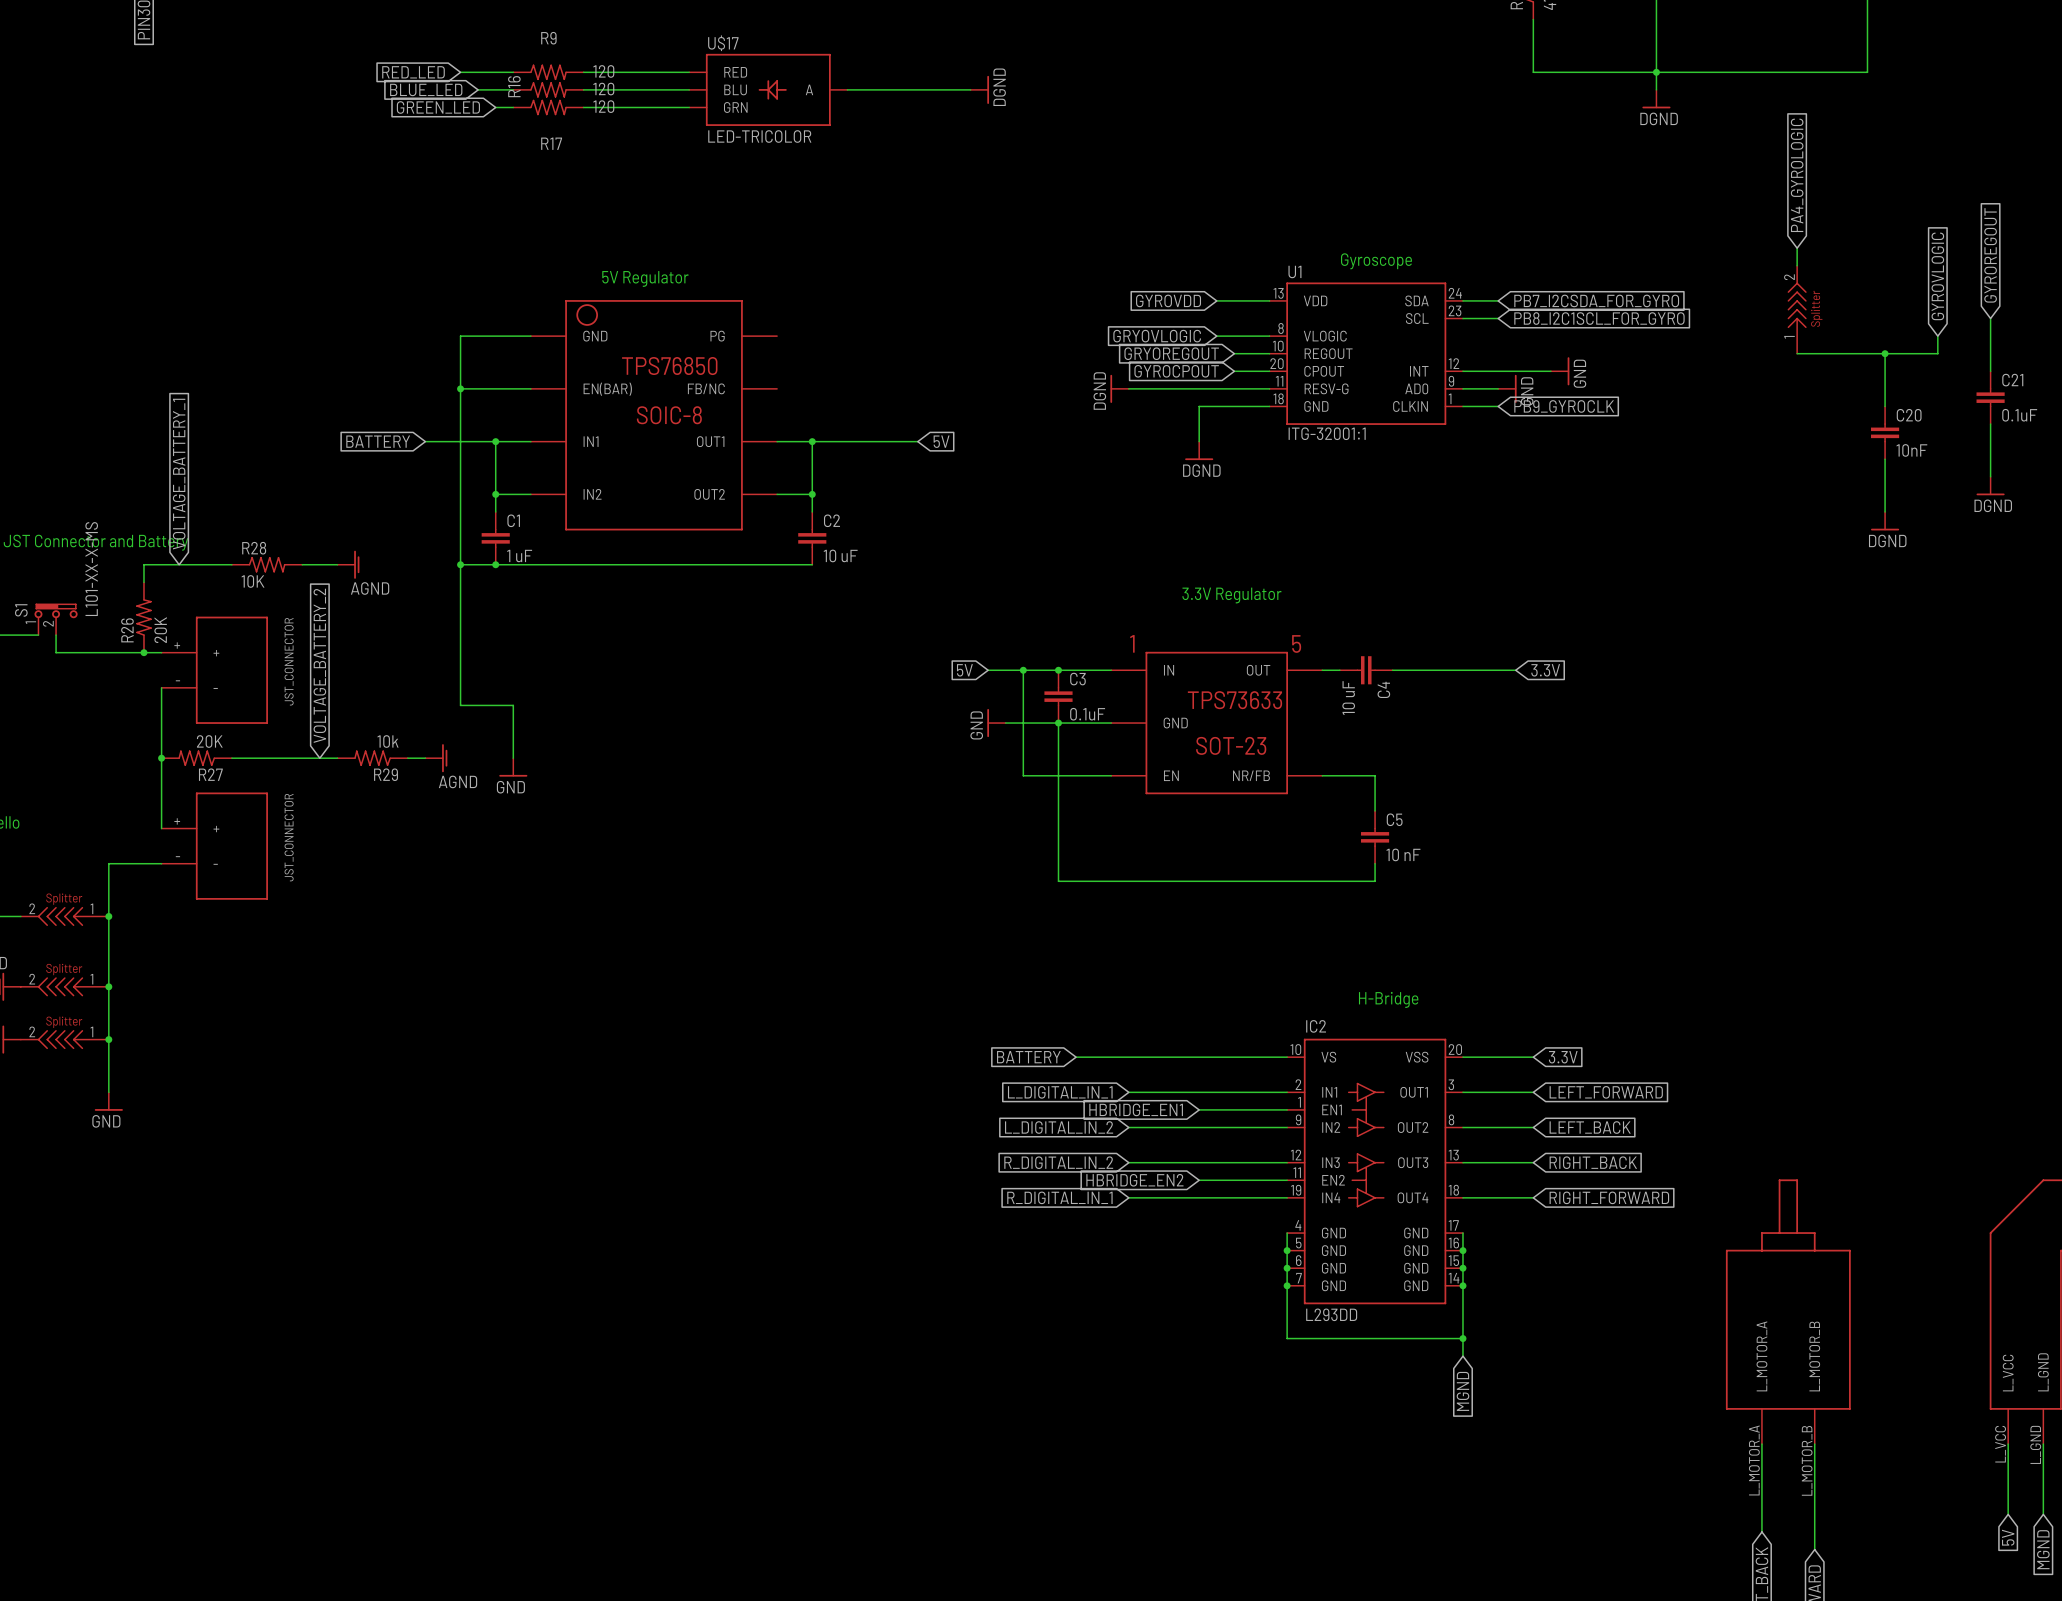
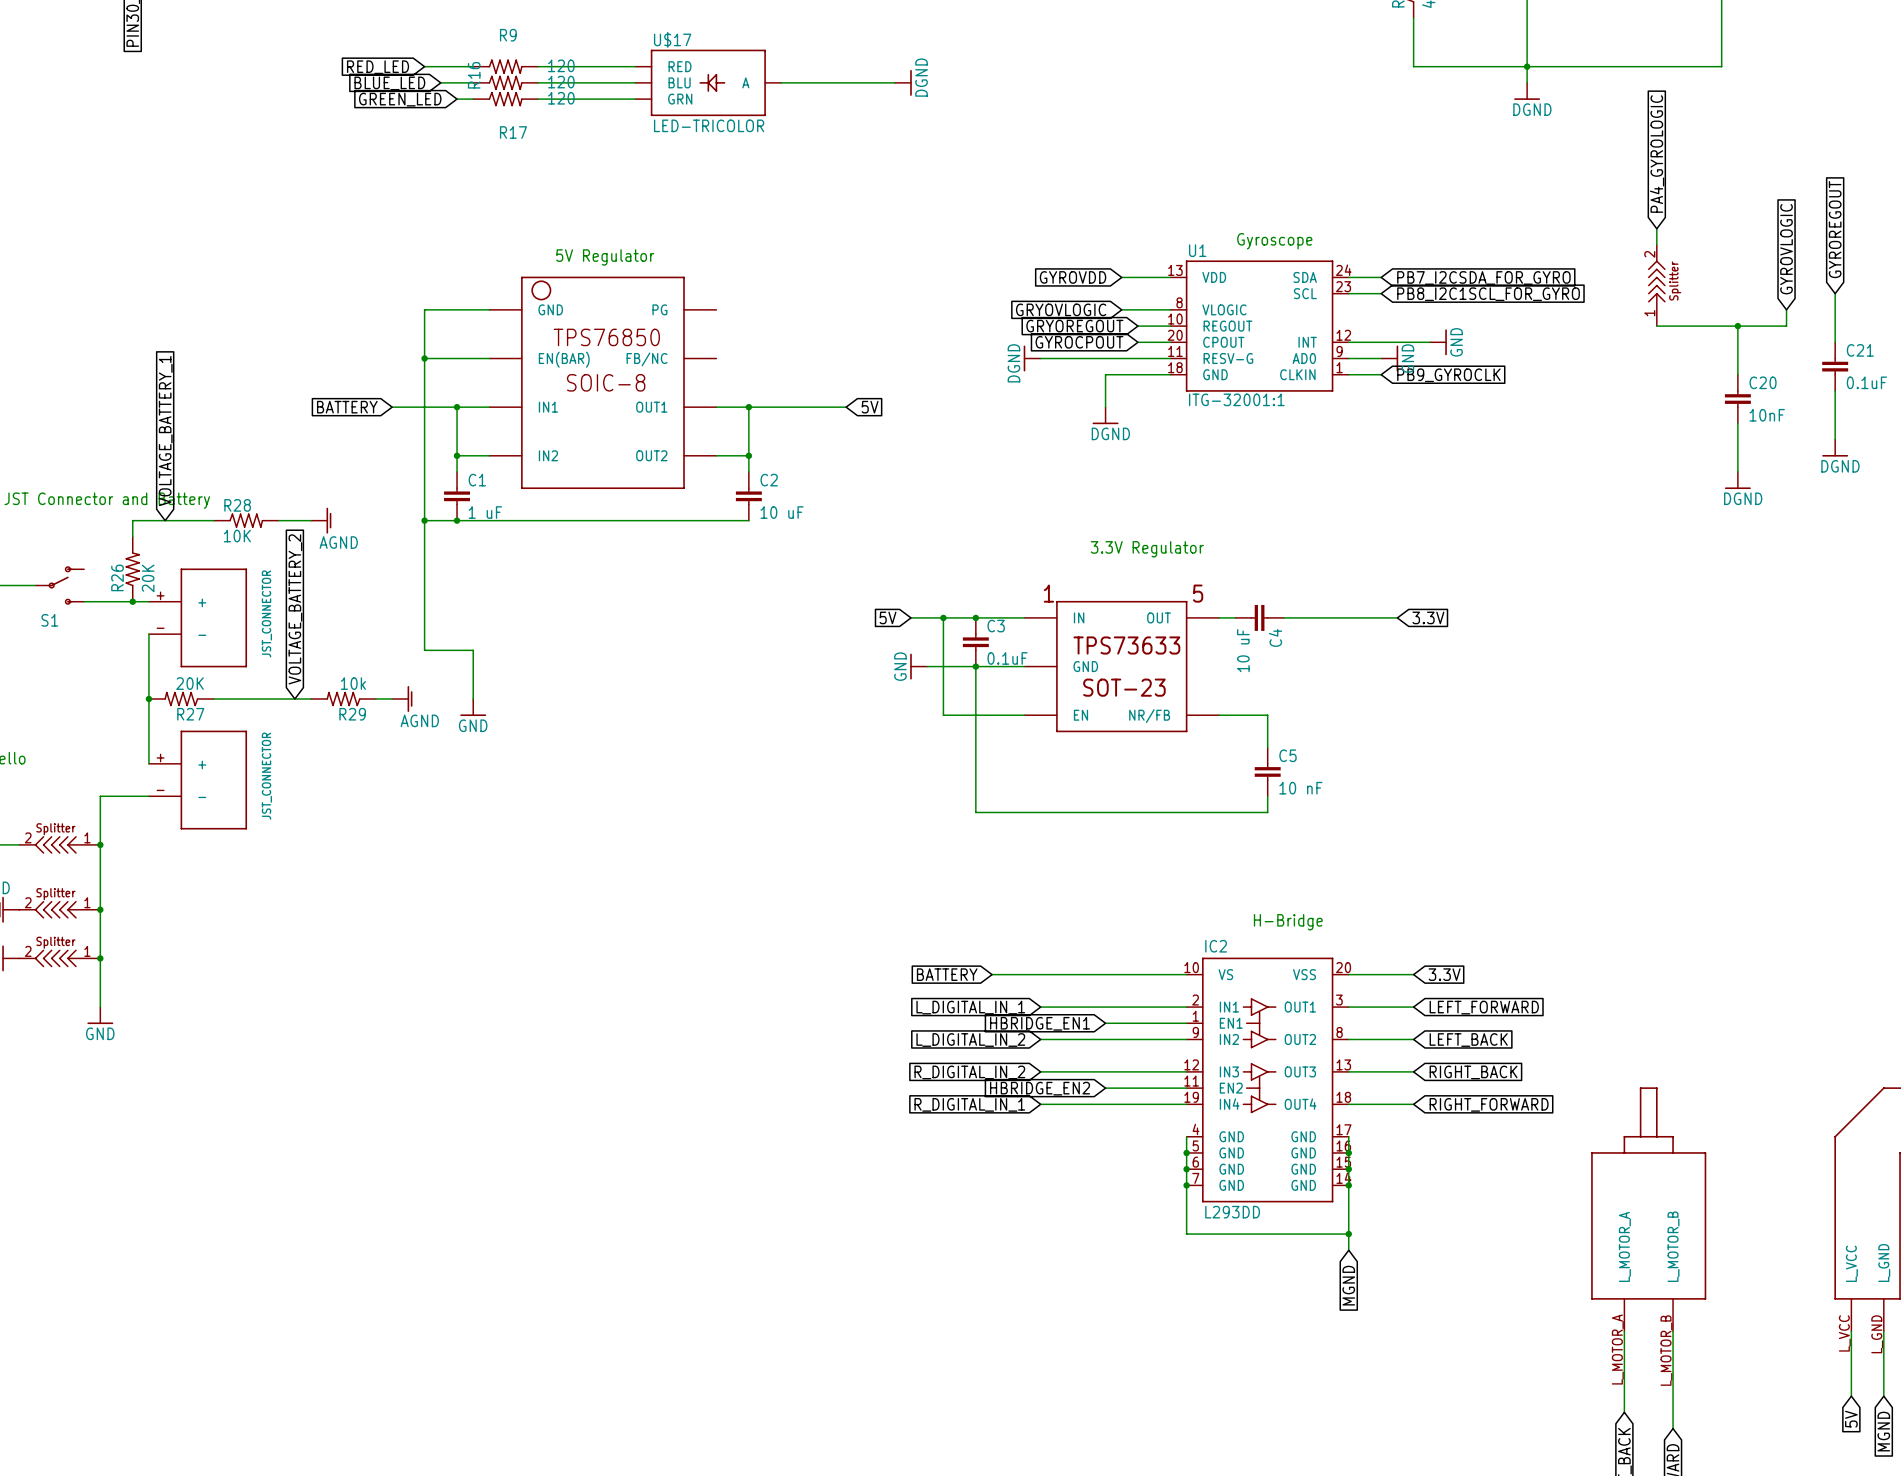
S1 value: L101-XX-X-MS (91, 569) -> none
S1 symbol: [34, 603, 78, 636] -> [35, 566, 85, 605]
S1 name position: S1 (21, 610) -> S1 (49, 620)
wire: (56, 635) (56, 652) (91, 652) -> none

